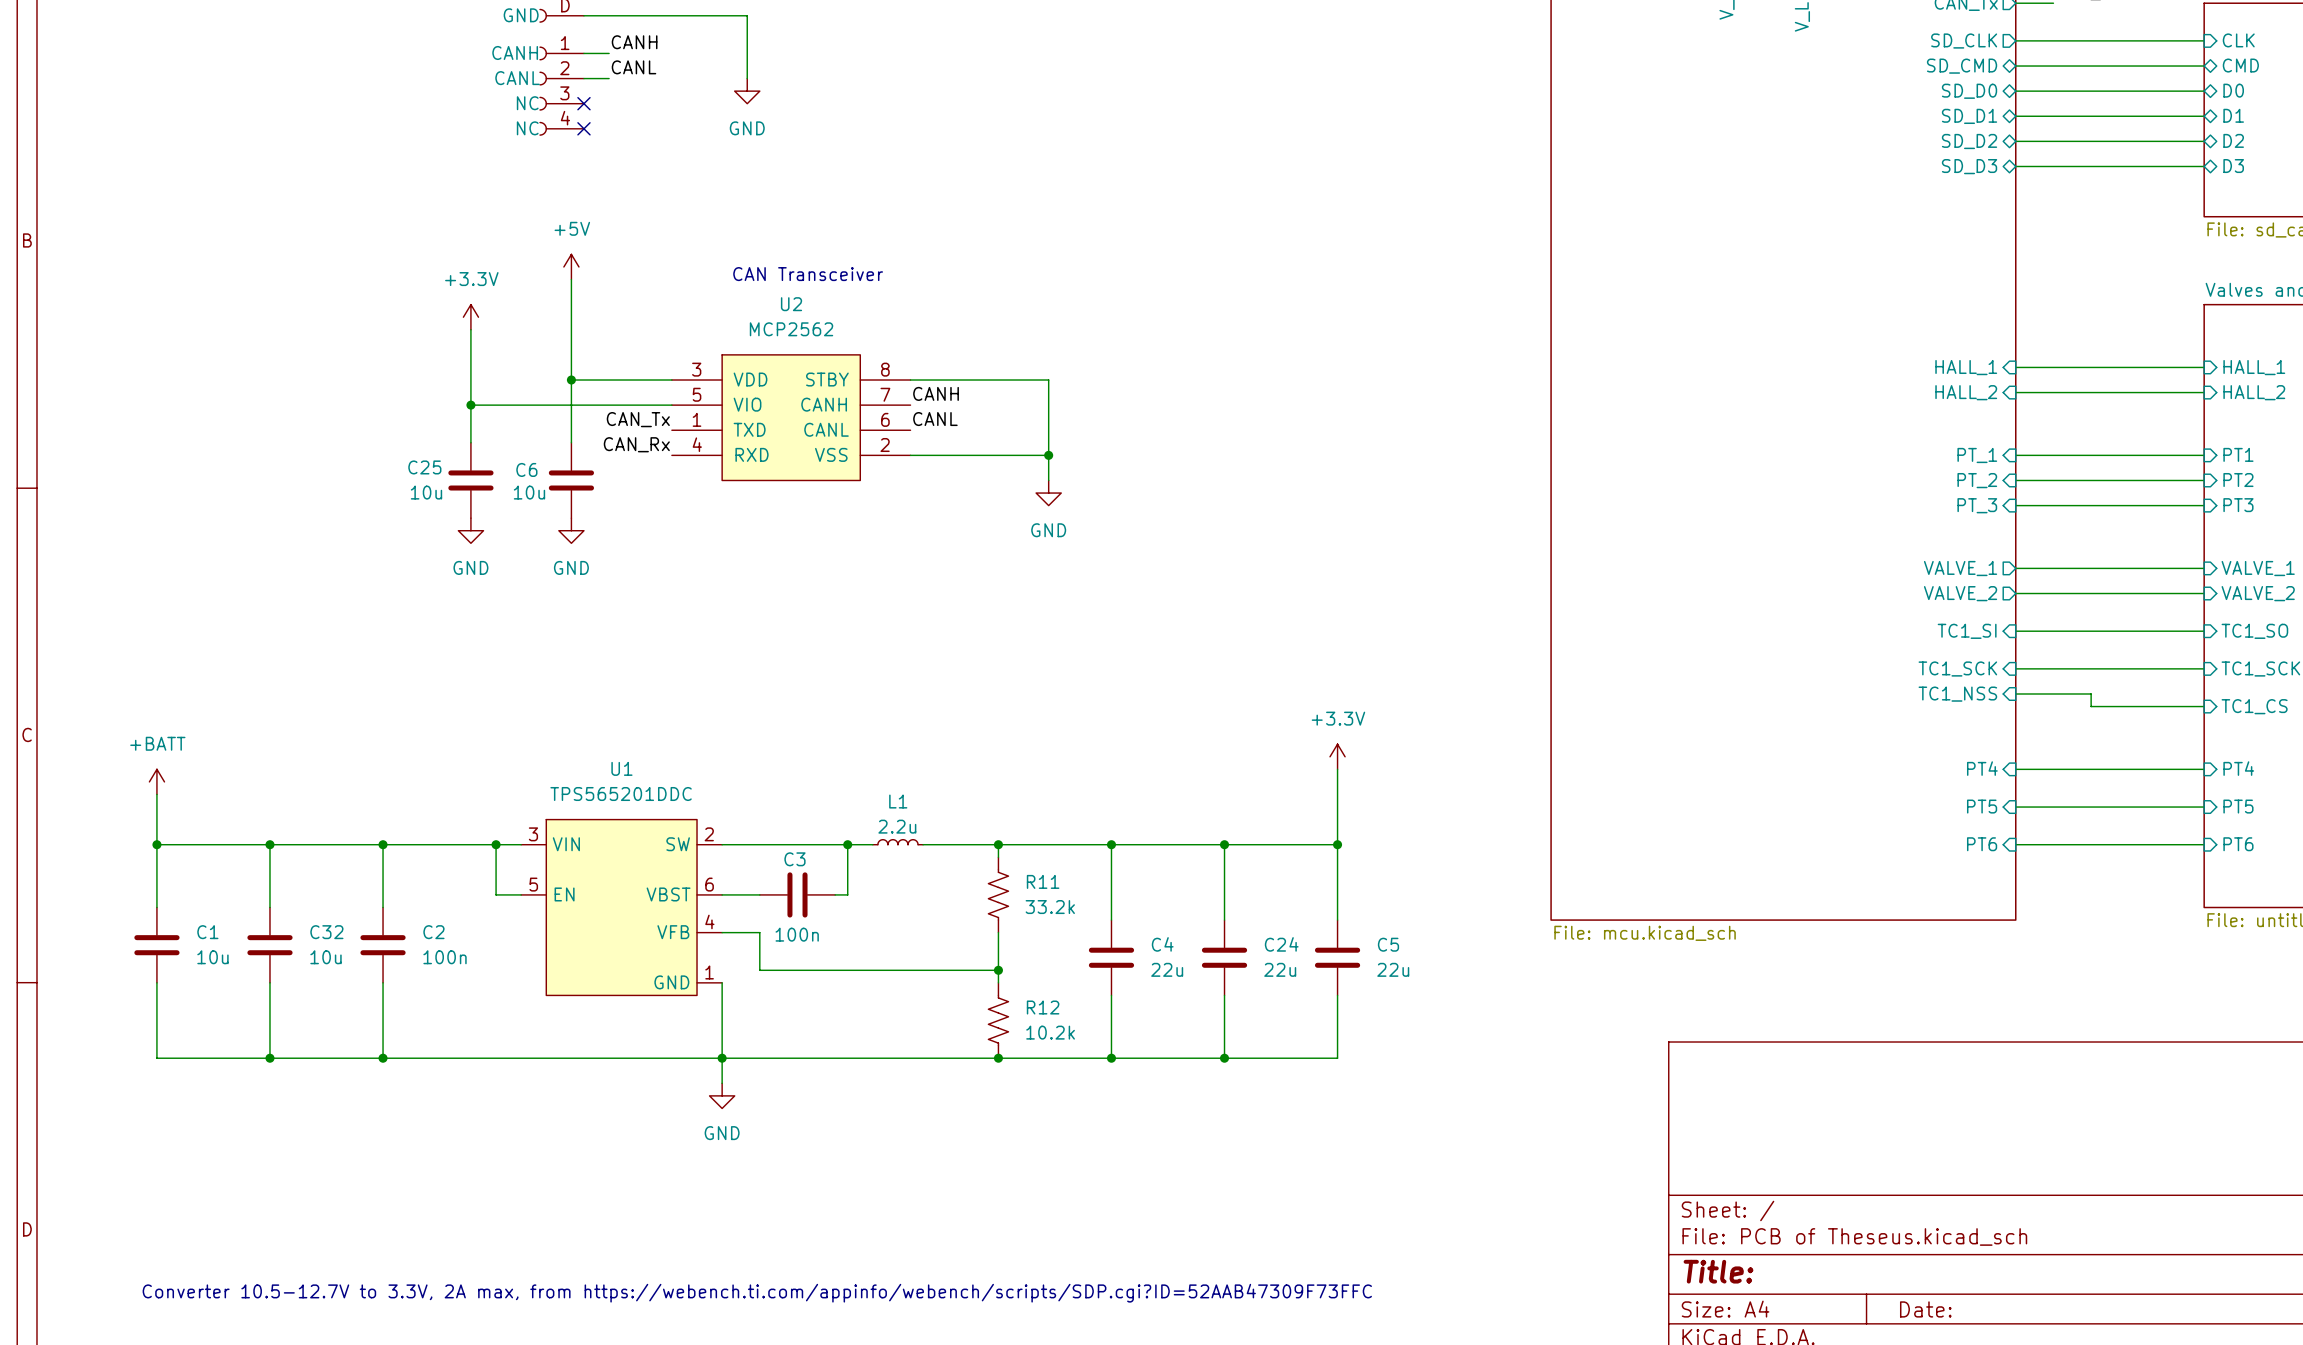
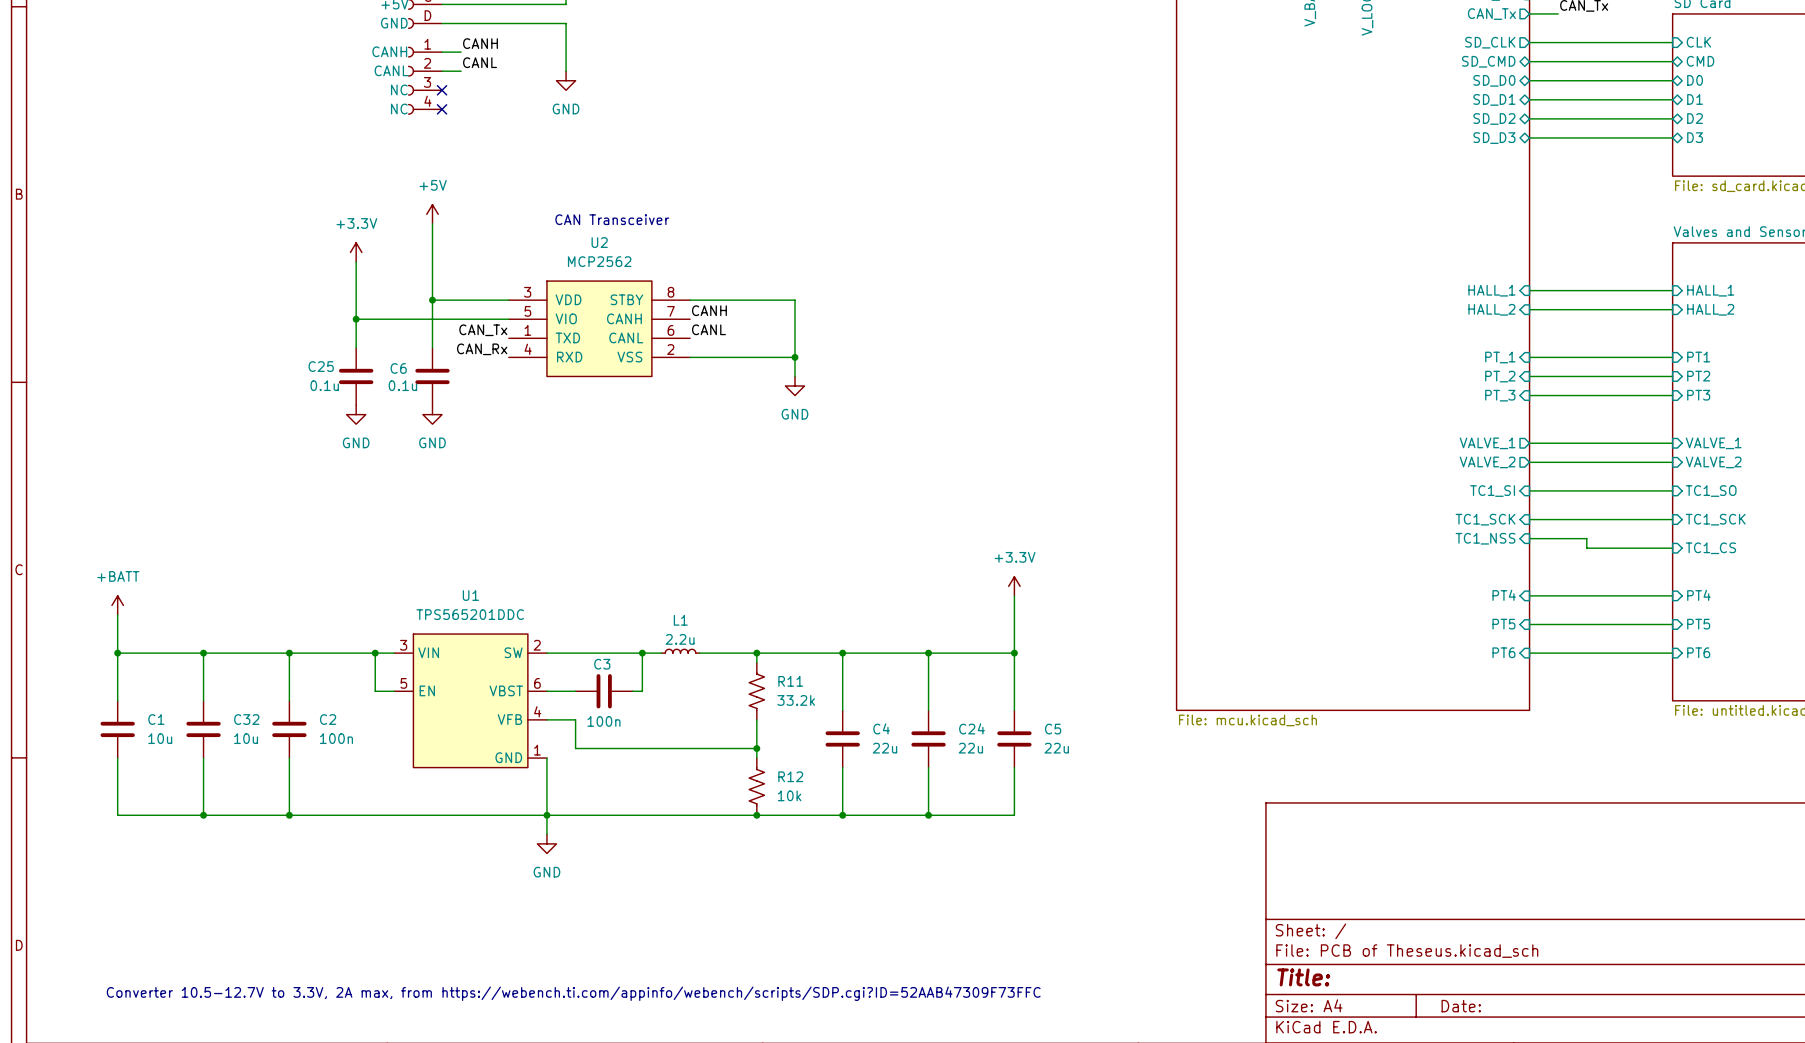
C25 value: 10u (426, 492) -> 0.1u (324, 385)
C6 value: 10u (529, 492) -> 0.1u (402, 385)
R12 value: 10.2k (1050, 1032) -> 10k (789, 795)

